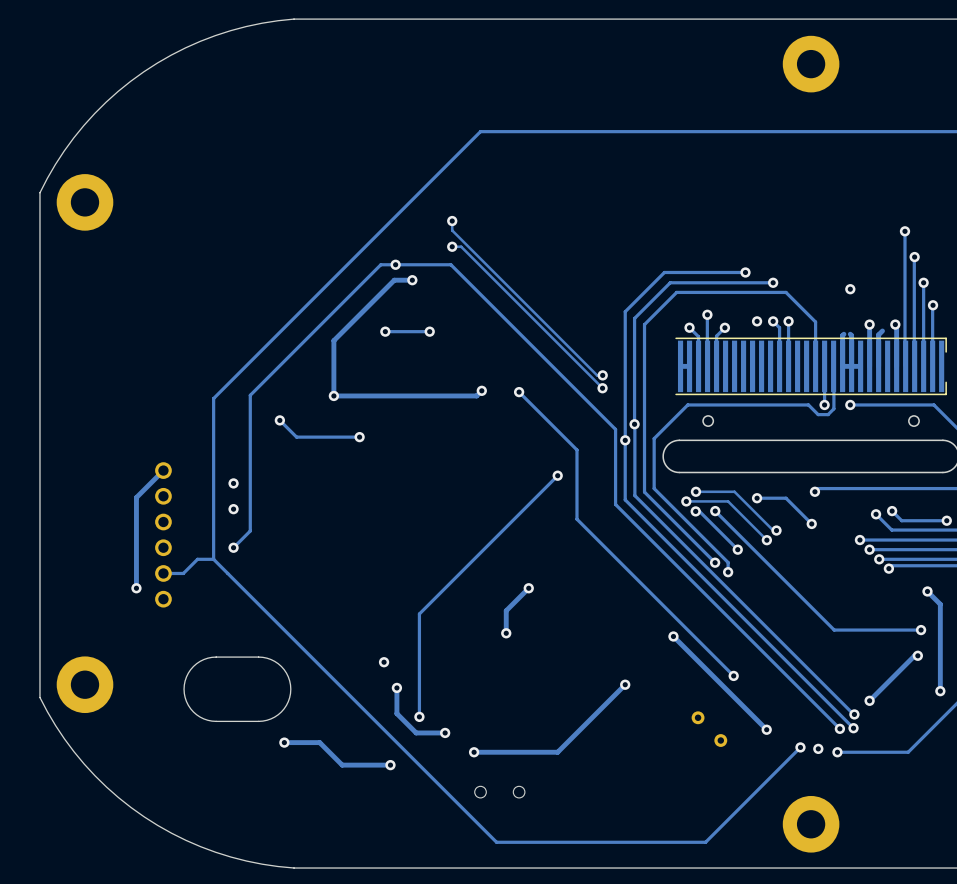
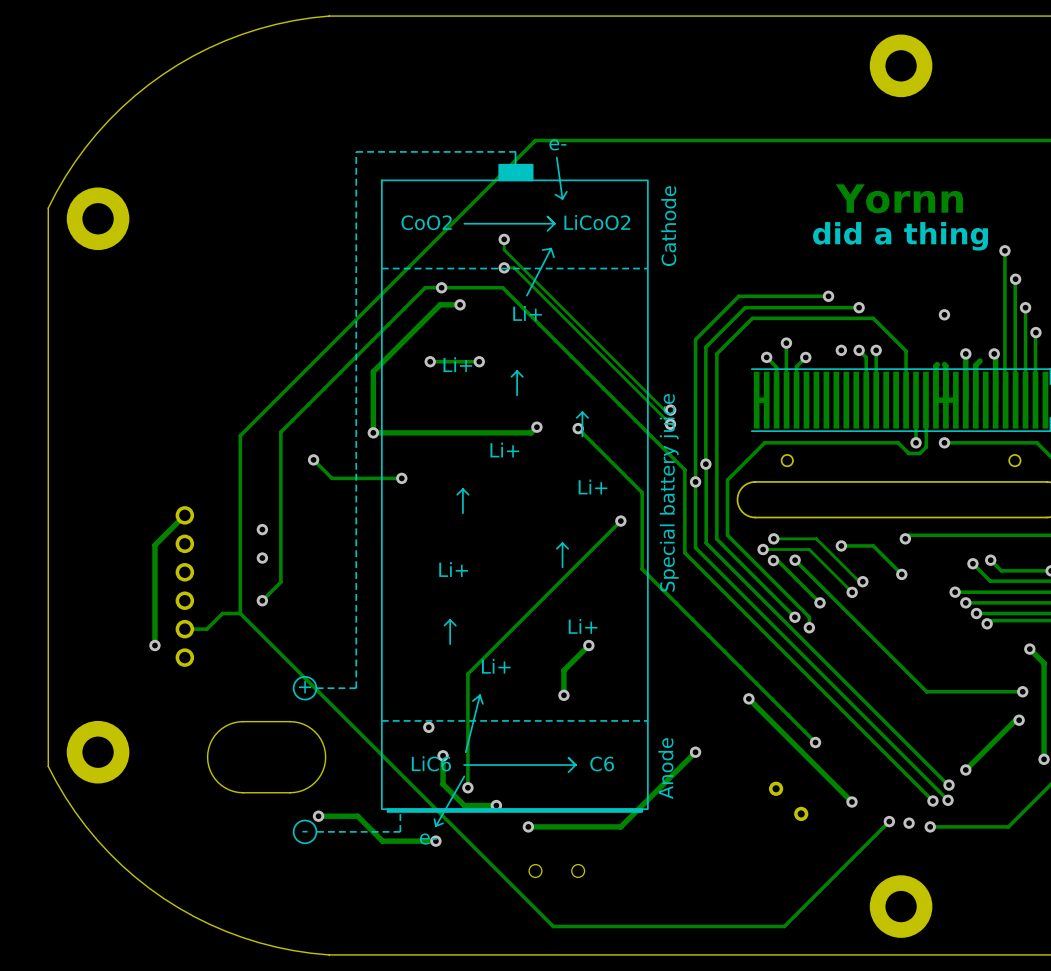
drawing: none -> [292, 151, 649, 845]
text: none -> Yornn (899, 198)
text: none -> did a thing (900, 236)

